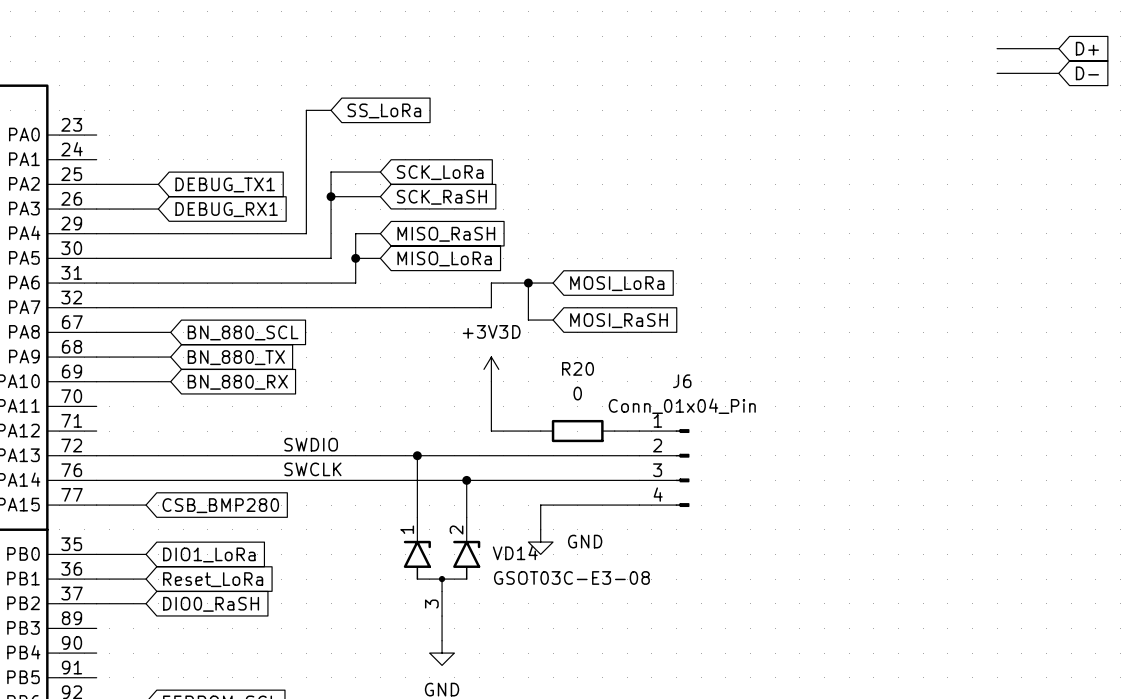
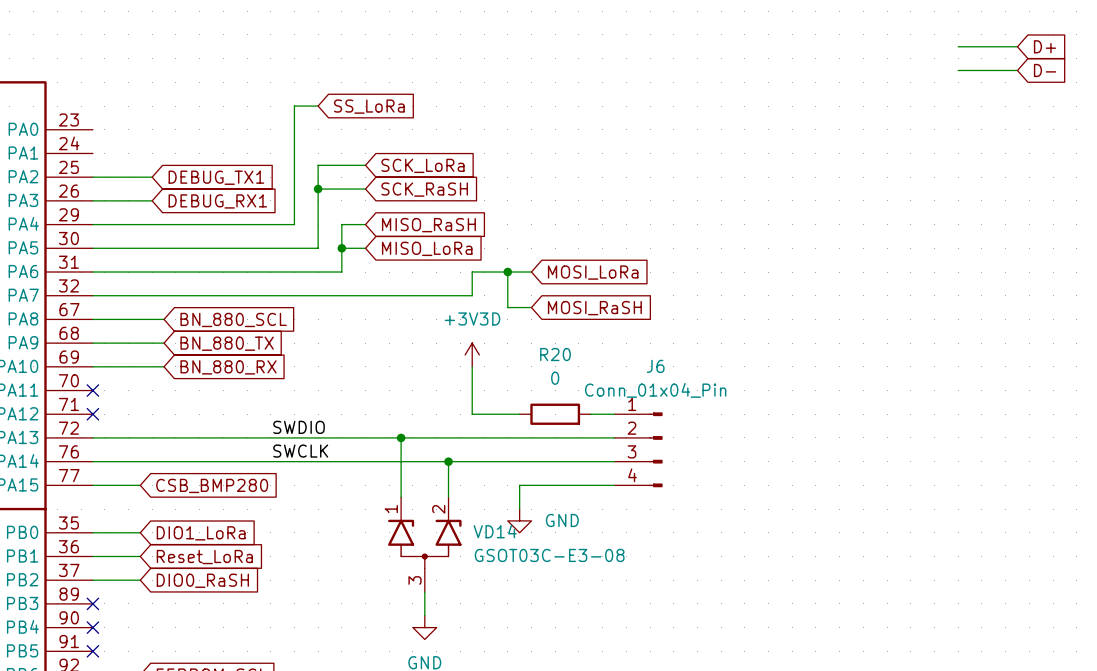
no-connect mark: none -> (92, 390)
no-connect mark: none -> (92, 414)
no-connect mark: none -> (92, 603)
no-connect mark: none -> (92, 627)
no-connect mark: none -> (92, 651)

